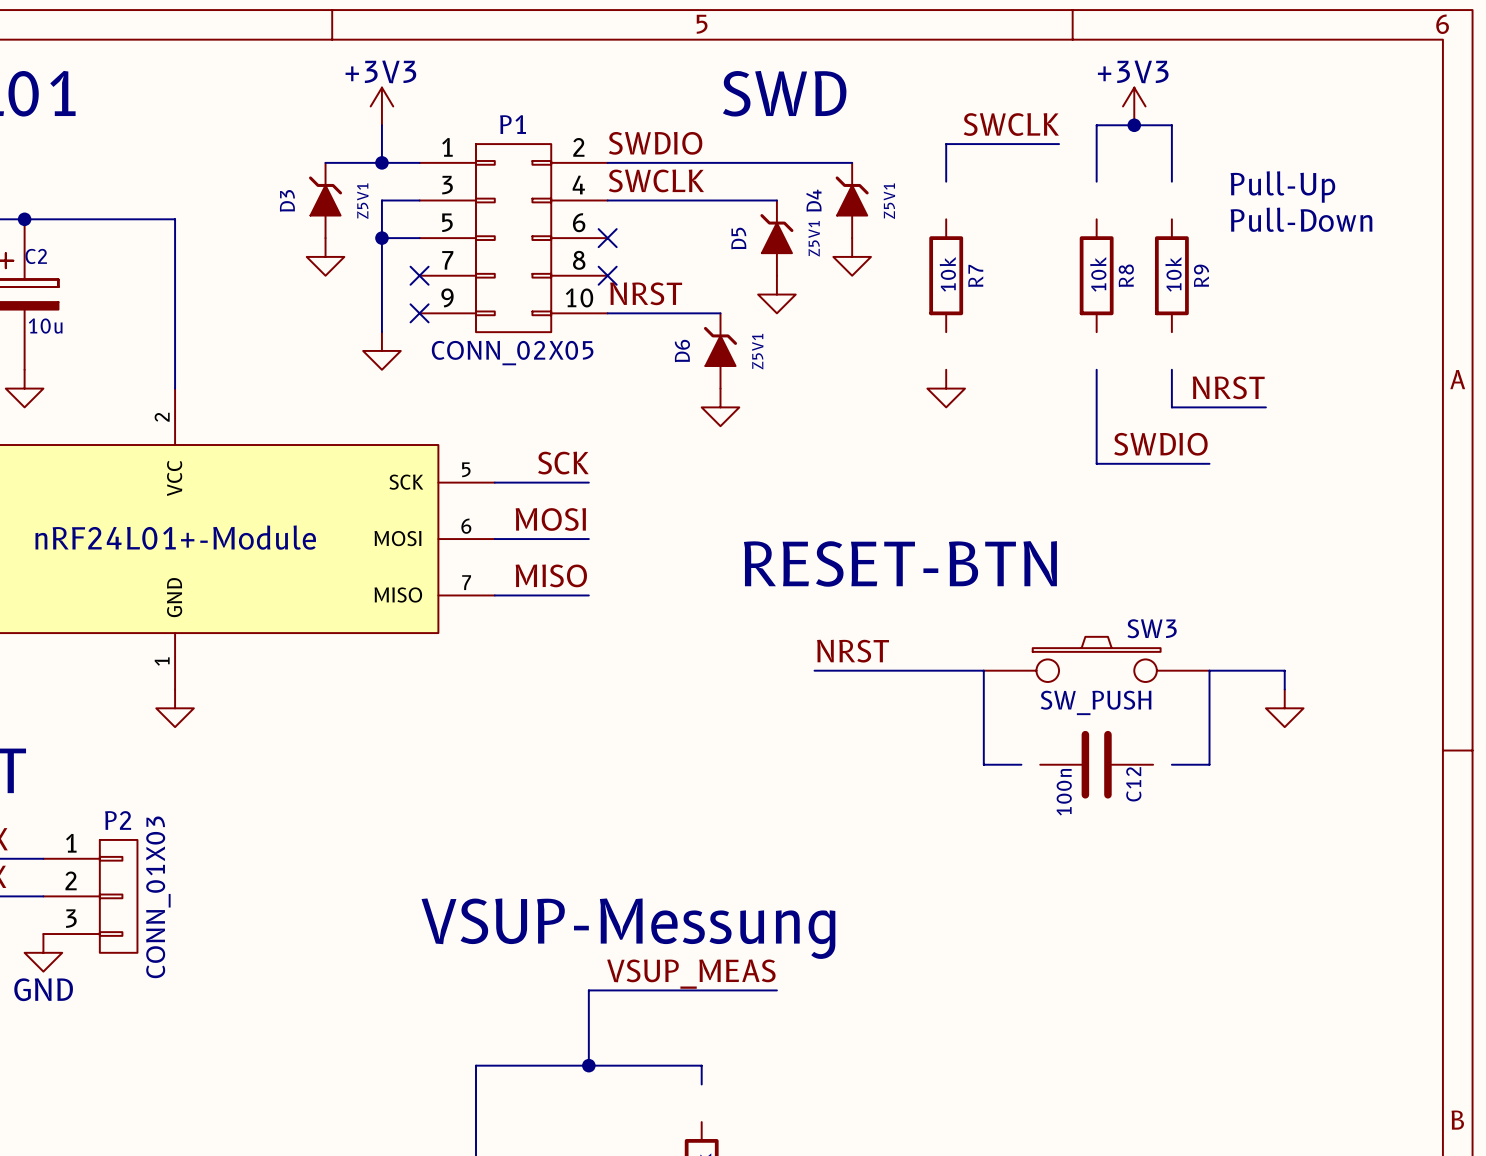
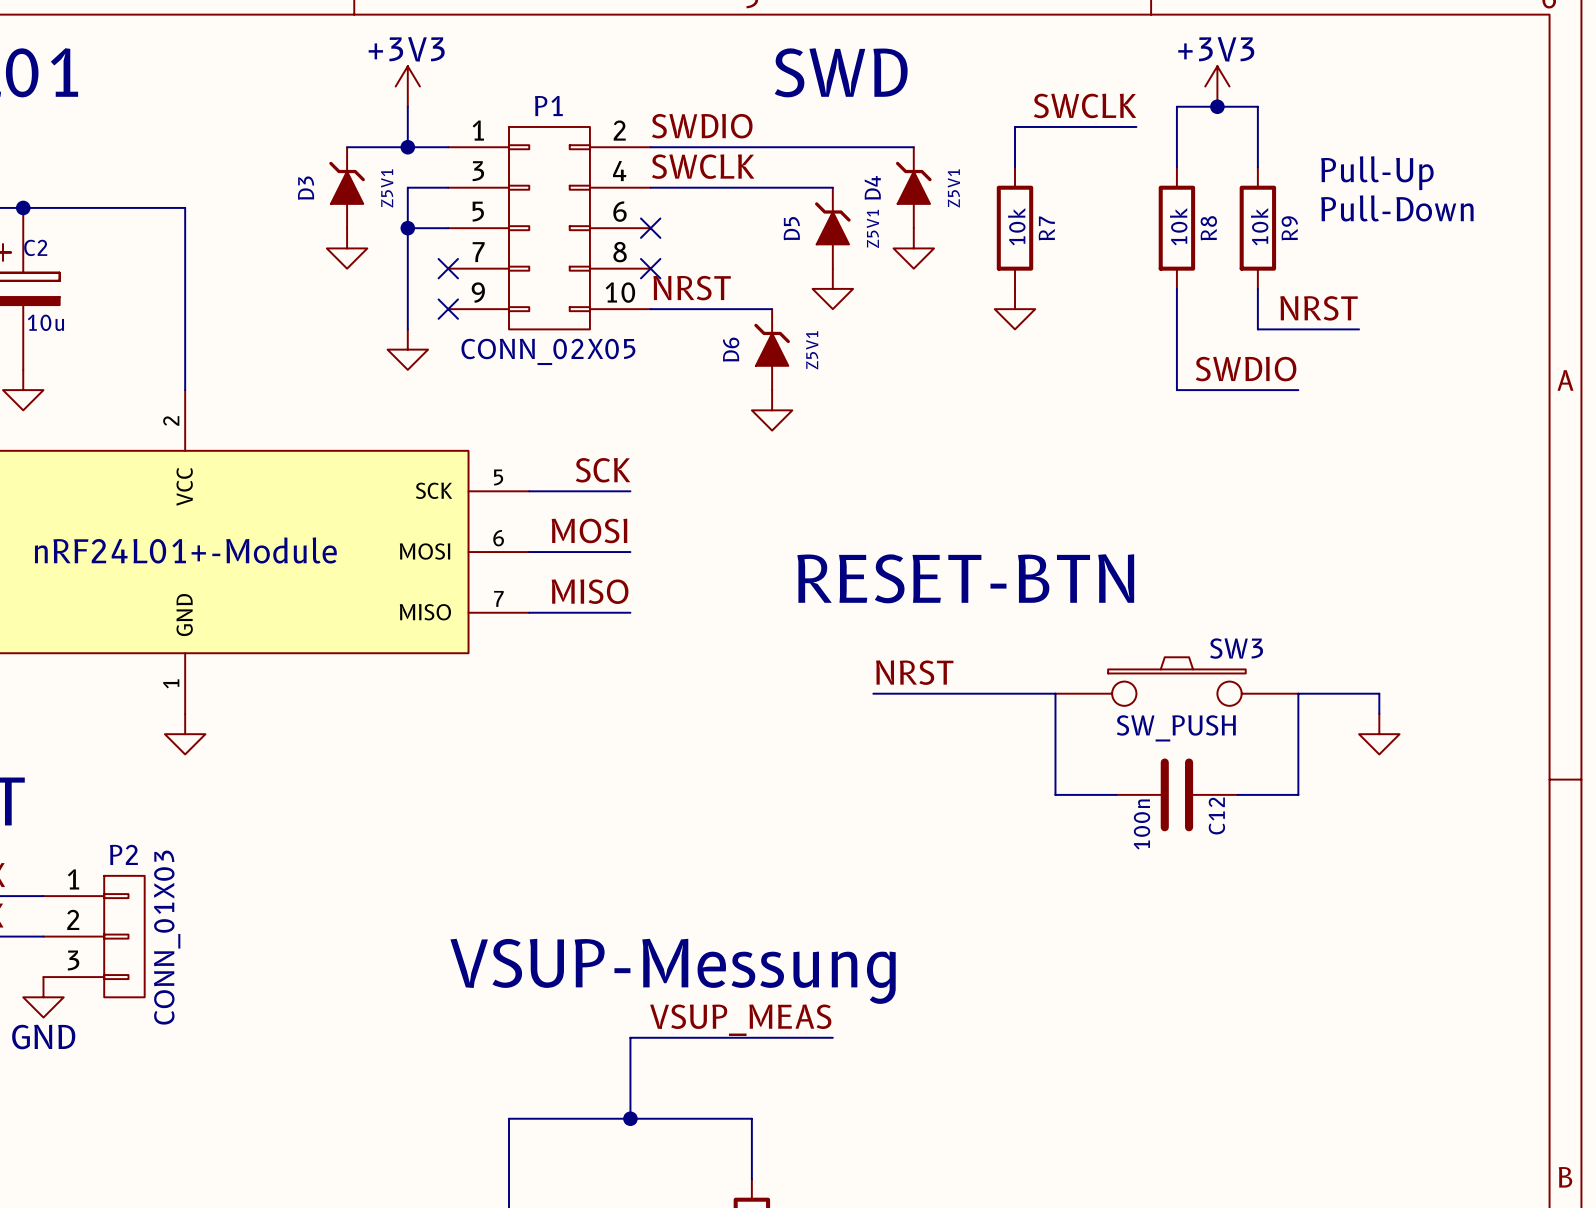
R7 position: (946, 275) -> (1015, 228)
R8 position: (1096, 275) -> (1176, 228)
R9 position: (1171, 275) -> (1257, 228)
wire: none -> (1176, 288) (1176, 369)
wire: (1171, 369) (1171, 407) (1265, 407) -> (1257, 288) (1257, 329) (1359, 329)
label position: NRST (1228, 387) -> NRST (1319, 308)
power symbol position: (946, 388) -> (1015, 309)
wire: (1096, 388) (1096, 463) (1209, 463) -> (1176, 390) (1298, 390)
label position: SWDIO (1160, 444) -> SWDIO (1246, 369)
wire: none -> (1095, 794) (1116, 794)
wire: none -> (1237, 794) (1257, 794)
wire: none -> (751, 1138) (751, 1179)

